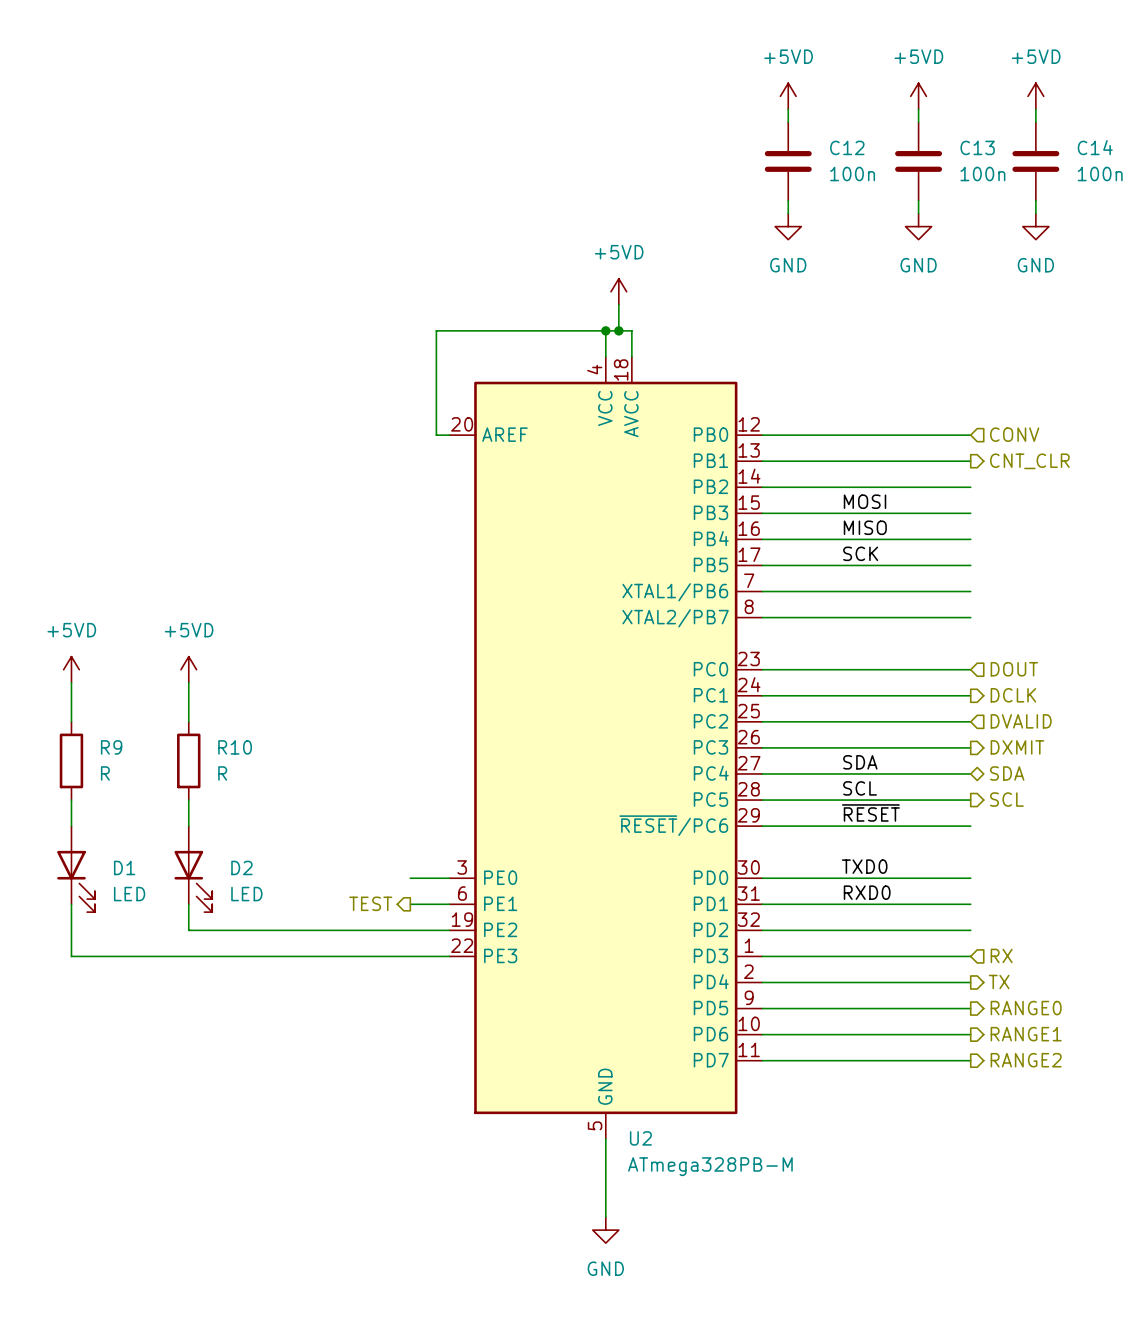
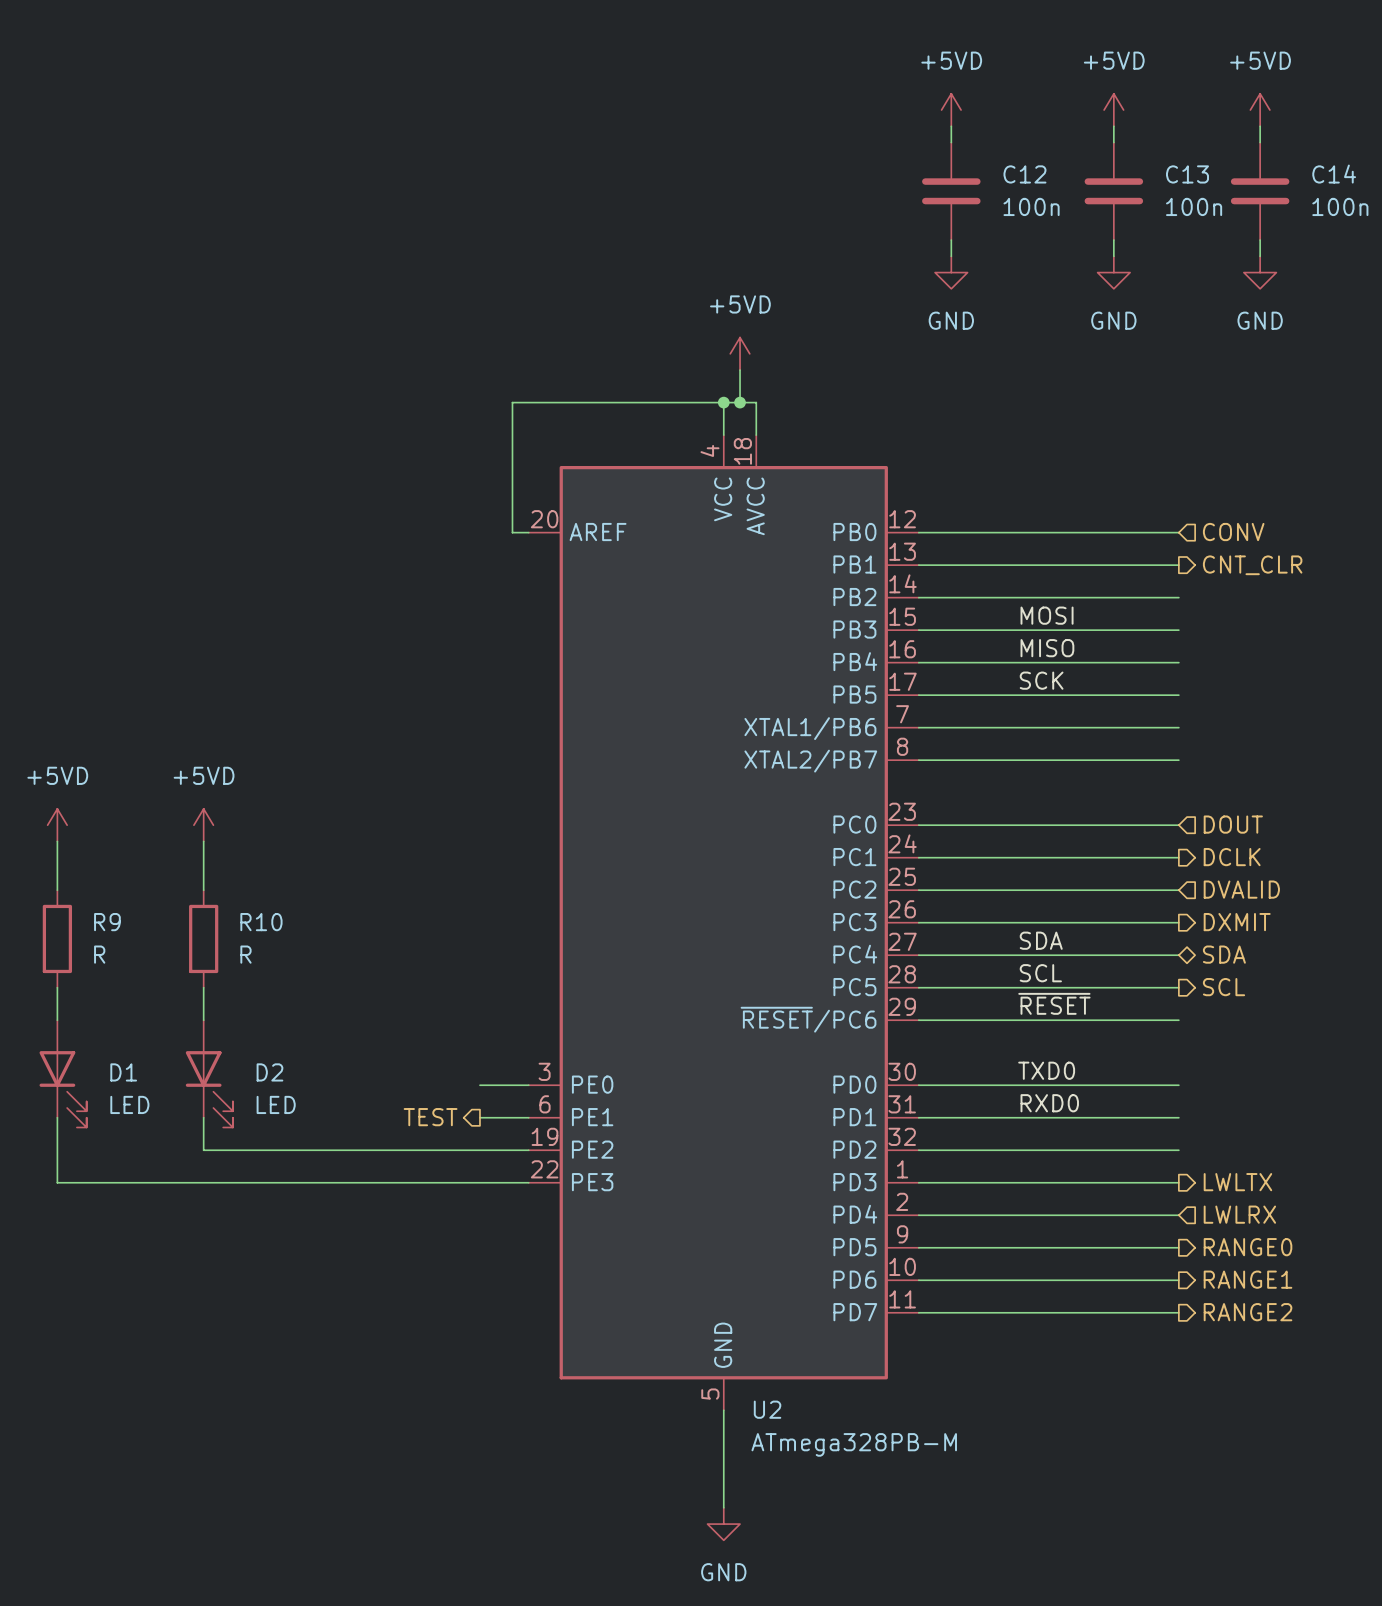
hierarchical label shape: input (1001, 955) -> output (1237, 1182)
hierarchical label: RX (1001, 955) -> LWLTX (1237, 1182)
hierarchical label shape: output (999, 982) -> input (1239, 1214)
hierarchical label: TX (999, 982) -> LWLRX (1239, 1214)

